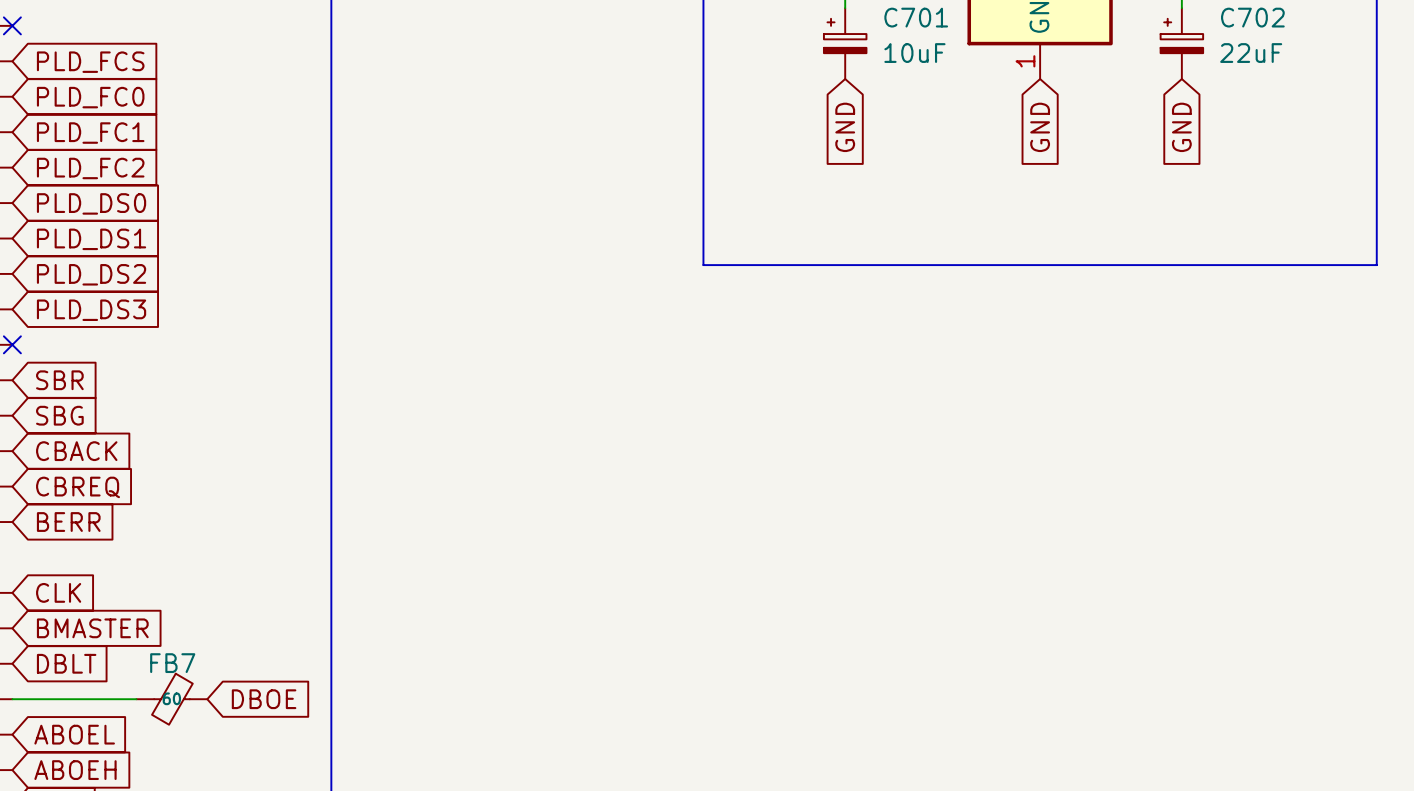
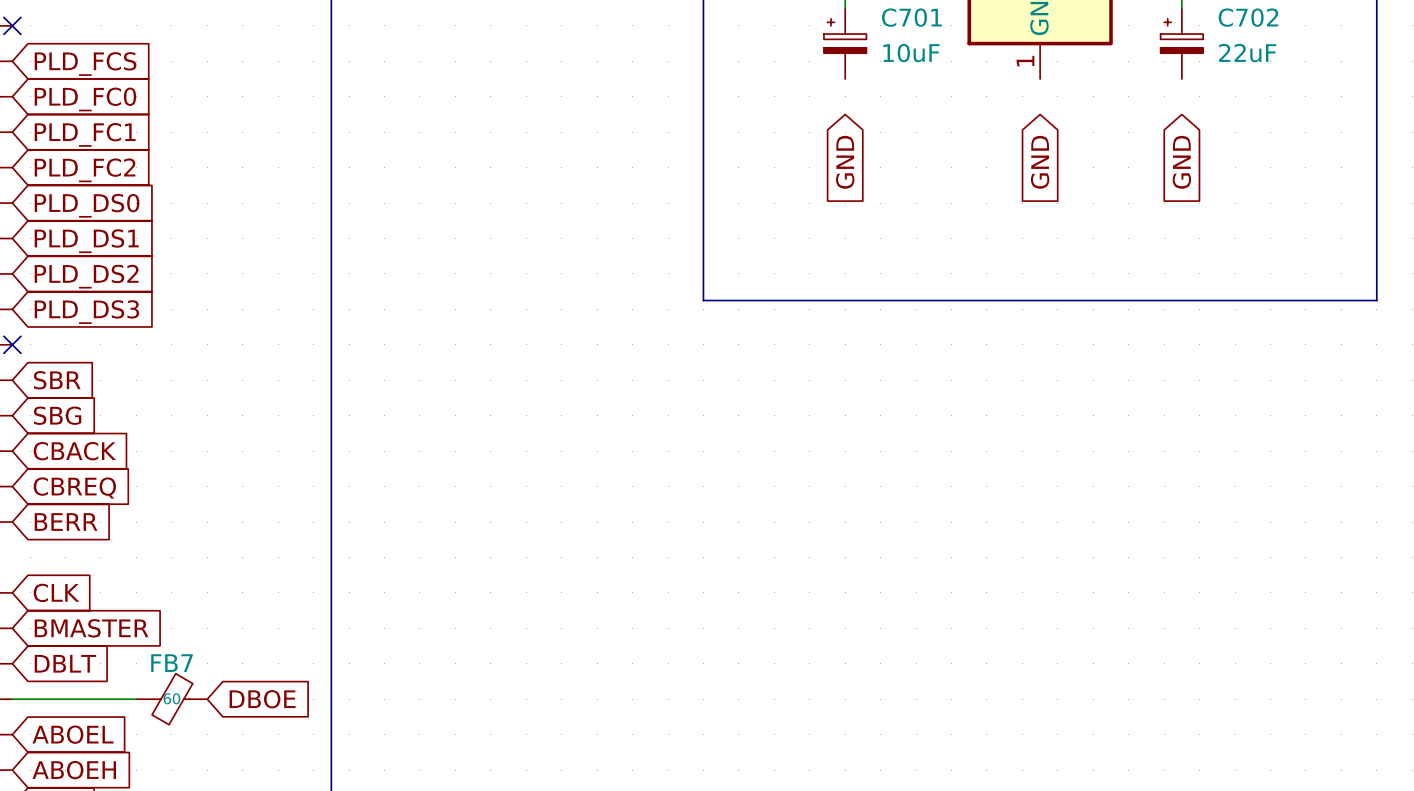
global label position: GND (845, 127) -> GND (845, 162)
global label position: GND (1040, 127) -> GND (1040, 162)
global label position: GND (1181, 127) -> GND (1181, 162)
line: (703, 265) (1376, 265) -> (703, 265) (703, 300) (1376, 300) (1376, 265)

